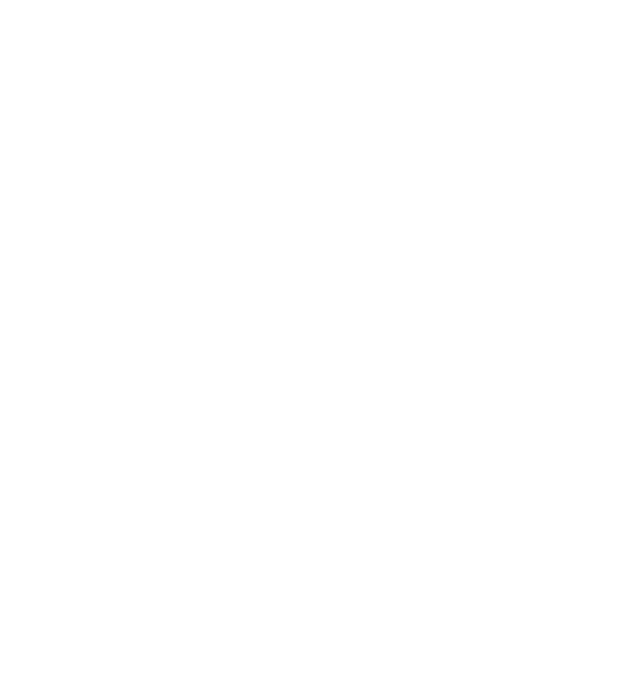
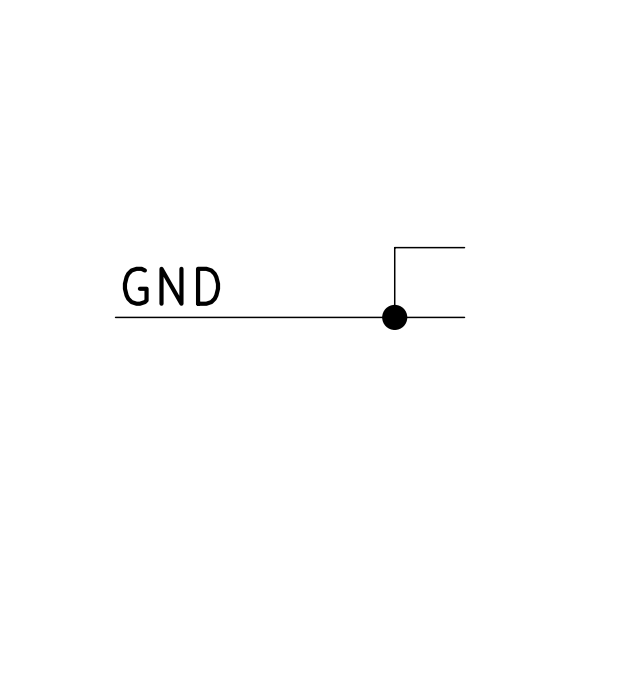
wire: none -> (464, 247) (394, 247) (394, 317)
label: none -> GND (171, 286)
wire: none -> (115, 317) (464, 317)
junction: none -> (394, 317)

